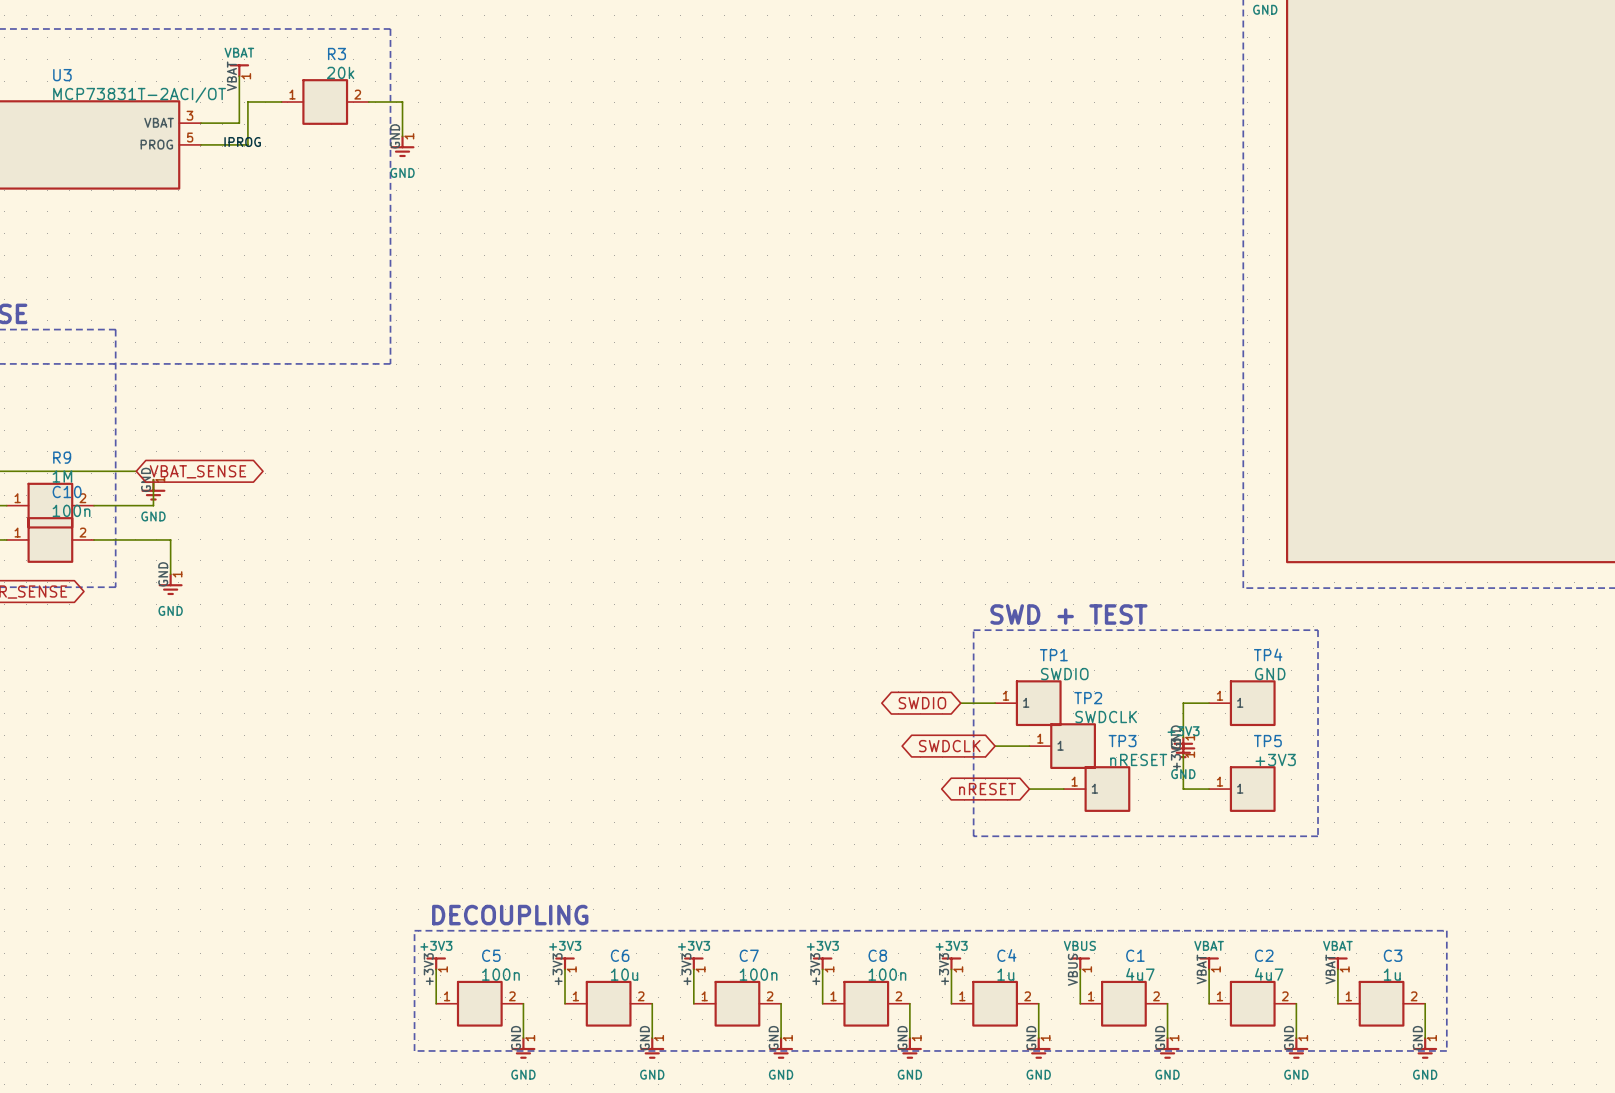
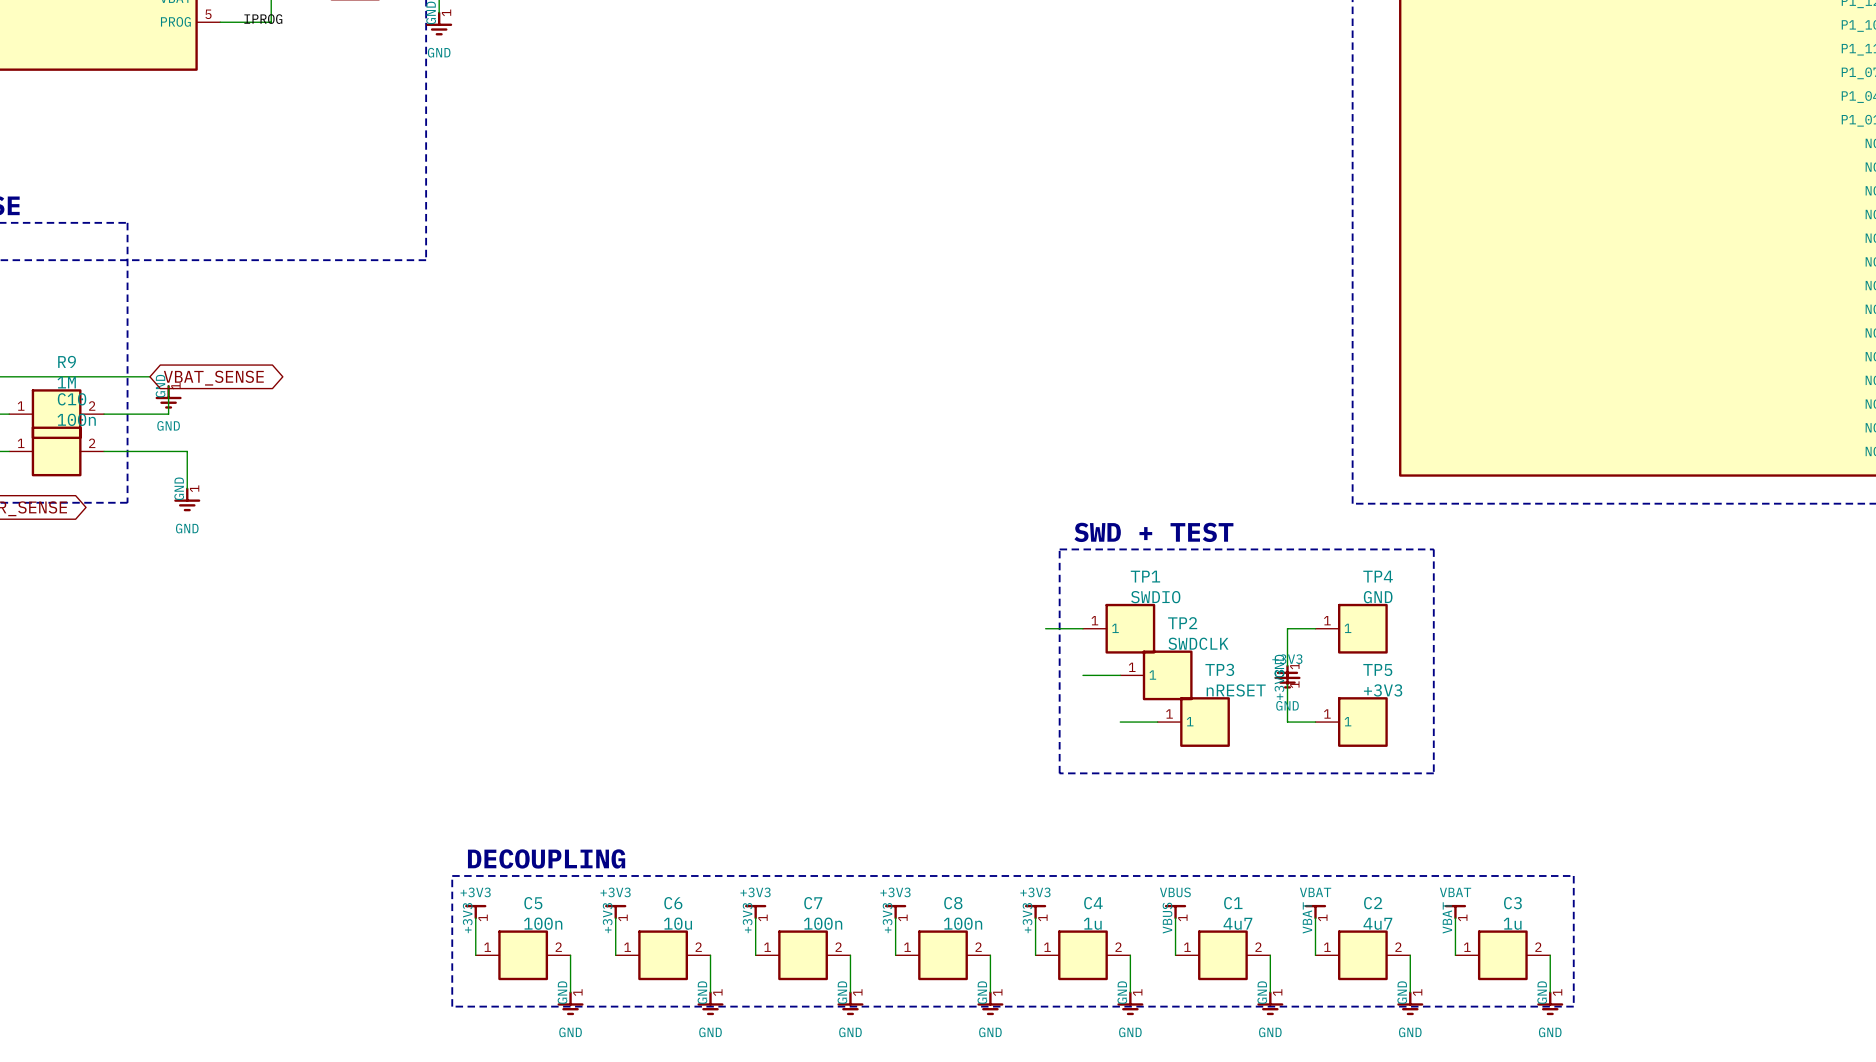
global label: SWDIO (922, 703) -> none
global label: SWDCLK (949, 746) -> none
global label: nRESET (987, 789) -> none

